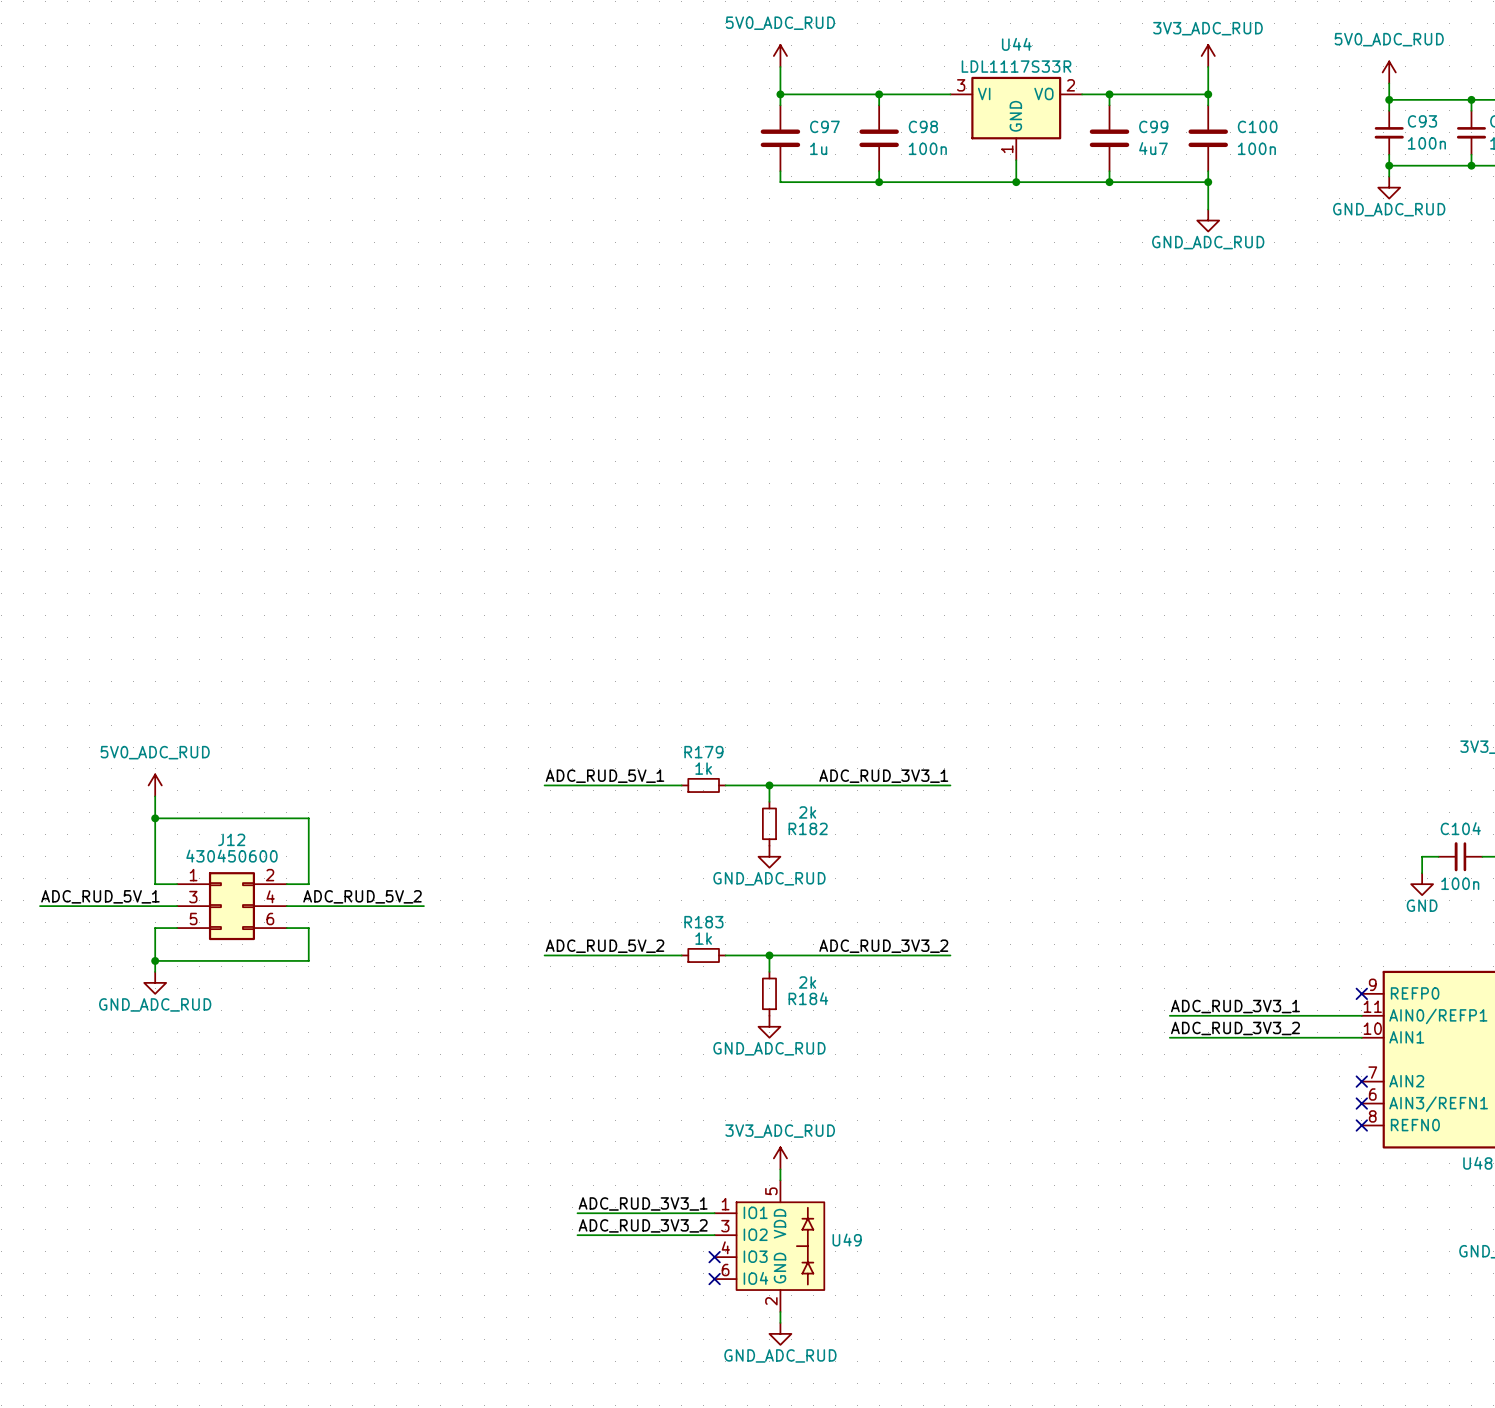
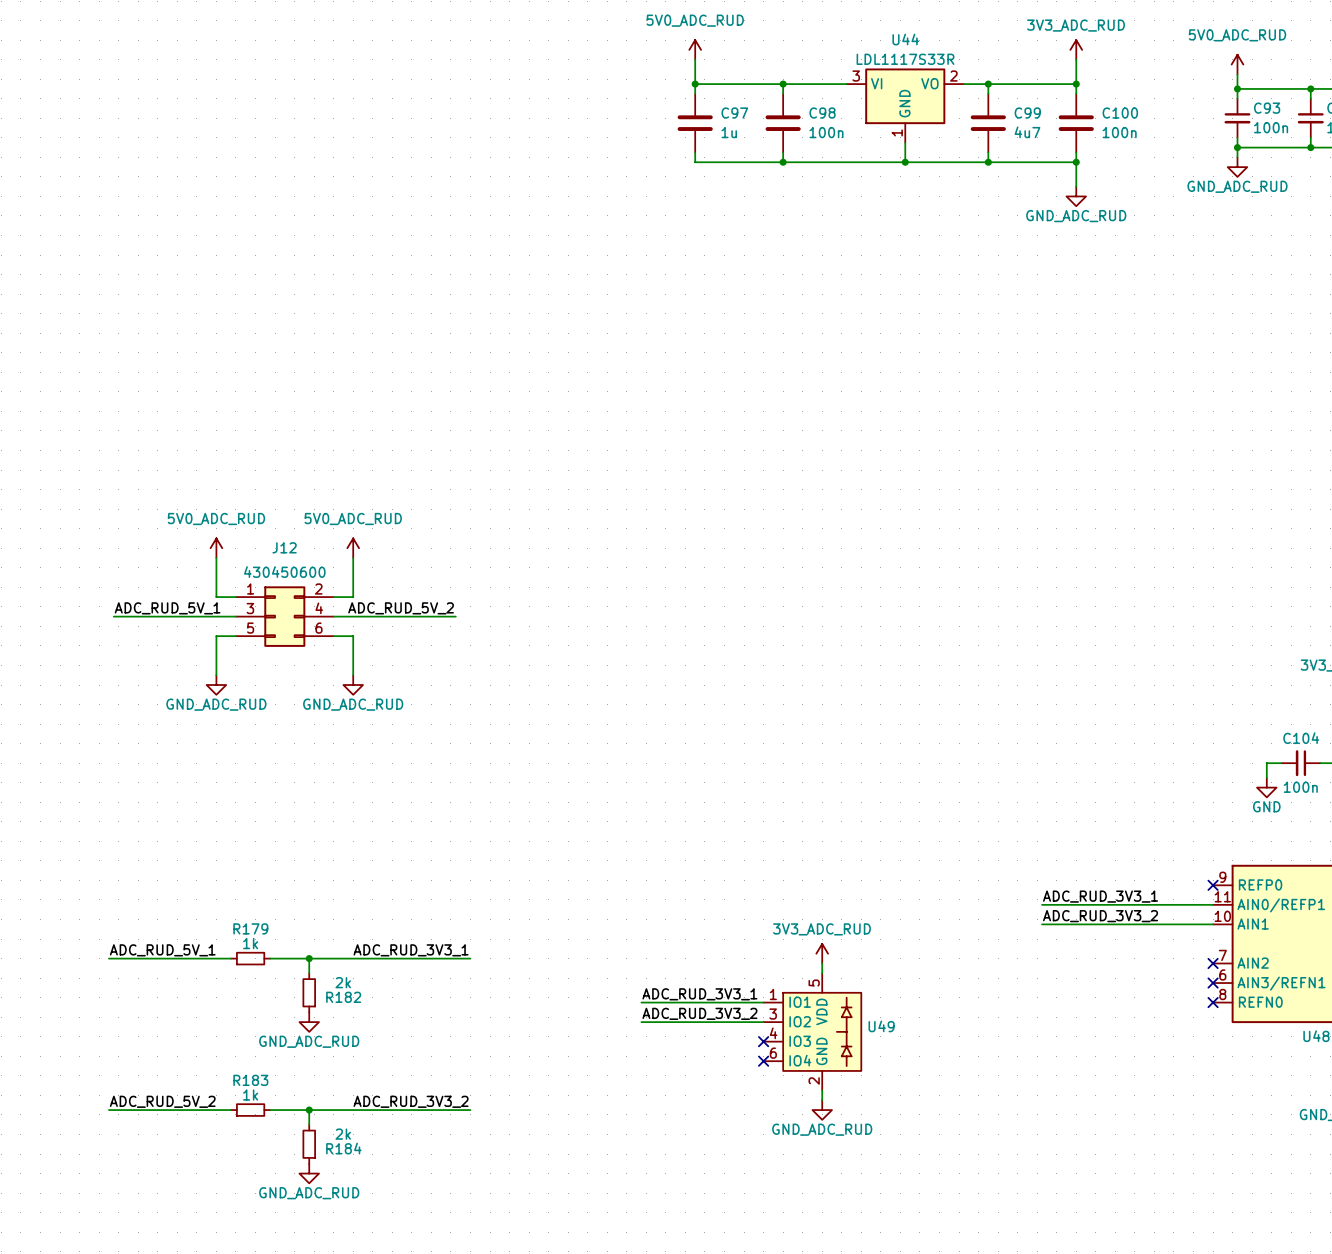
power symbol: none -> 5V0_ADC_RUD (216, 548)
power symbol: none -> 5V0_ADC_RUD (353, 548)
wire: none -> (216, 557) (216, 597) (235, 597)
wire: none -> (353, 557) (353, 597) (333, 597)
label: none -> ADC_RUD_5V_1 (167, 608)
label: none -> ADC_RUD_5V_2 (401, 608)
wire: none -> (113, 616) (235, 616)
wire: none -> (235, 636) (216, 636) (216, 675)
wire: none -> (333, 636) (353, 636) (353, 675)
power symbol: none -> GND_ADC_RUD (216, 685)
power symbol: none -> GND_ADC_RUD (353, 685)
label: ADC_RUD_5V_1 (605, 776) -> none
label: ADC_RUD_3V3_1 (883, 776) -> none
power symbol: 5V0_ADC_RUD (155, 785) -> none
wire: (544, 785) (681, 785) -> (333, 616) (455, 616)
R179 position: (703, 785) -> (250, 958)
wire: (725, 785) (950, 785) -> none
wire: (769, 785) (769, 801) -> none
junction: (769, 785) -> none
wire: (155, 796) (155, 884) (177, 884) -> none
wire: (155, 818) (308, 818) (308, 884) (286, 884) -> none
junction: (155, 818) -> none
R182 position: (769, 823) -> (309, 992)
J12 name position: J12 (231, 839) -> J12 (284, 547)
power symbol: GND_ADC_RUD (769, 856) -> none
label: ADC_RUD_5V_1 (100, 896) -> none
label: ADC_RUD_5V_2 (362, 896) -> none
wire: (40, 906) (177, 906) -> (108, 958) (231, 958)
J12 position: (231, 906) -> (284, 616)
wire: (286, 906) (423, 906) -> none
wire: (177, 928) (155, 928) (155, 971) -> none
wire: (286, 928) (308, 928) (308, 960) (155, 960) -> none
label: ADC_RUD_5V_2 (605, 946) -> none
label: ADC_RUD_3V3_2 (883, 946) -> none
wire: (544, 955) (681, 955) -> none
R183 position: (703, 955) -> (250, 1110)
wire: (725, 955) (950, 955) -> none
wire: (769, 955) (769, 971) -> none
junction: (769, 955) -> none
junction: (155, 960) -> none
power symbol: GND_ADC_RUD (155, 982) -> none
R184 position: (769, 993) -> (309, 1144)
power symbol: GND_ADC_RUD (769, 1026) -> none
label: none -> ADC_RUD_5V_1 (162, 950)
label: none -> ADC_RUD_3V3_1 (411, 950)
wire: none -> (270, 958) (470, 958)
wire: none -> (309, 958) (309, 973)
junction: none -> (309, 958)
label: none -> ADC_RUD_3V3_1 (699, 994)
label: none -> ADC_RUD_3V3_2 (699, 1013)
power symbol: none -> GND_ADC_RUD (309, 1022)
power symbol position: 3V3_ADC_RUD (780, 1158) -> 3V3_ADC_RUD (822, 953)
wire: (780, 1169) (780, 1180) -> (822, 963) (822, 973)
no-connect mark: none -> (763, 1041)
no-connect mark: none -> (763, 1061)
label: ADC_RUD_3V3_1 (643, 1203) -> none
wire: (577, 1213) (714, 1213) -> (641, 1002) (763, 1002)
label position: ADC_RUD_3V3_2 (643, 1225) -> ADC_RUD_3V3_2 (411, 1101)
wire: (577, 1235) (714, 1235) -> (641, 1022) (763, 1022)
label: none -> ADC_RUD_5V_2 (162, 1101)
wire: none -> (108, 1110) (231, 1110)
wire: none -> (270, 1110) (470, 1110)
wire: none -> (309, 1110) (309, 1124)
junction: none -> (309, 1110)
U49 position: (769, 1246) -> (812, 1031)
power symbol: none -> GND_ADC_RUD (822, 1110)
no-connect mark: (714, 1257) -> none
no-connect mark: (714, 1279) -> none
wire: (780, 1311) (780, 1322) -> (822, 1090) (822, 1100)
power symbol: none -> GND_ADC_RUD (309, 1173)
power symbol: GND_ADC_RUD (780, 1333) -> none

